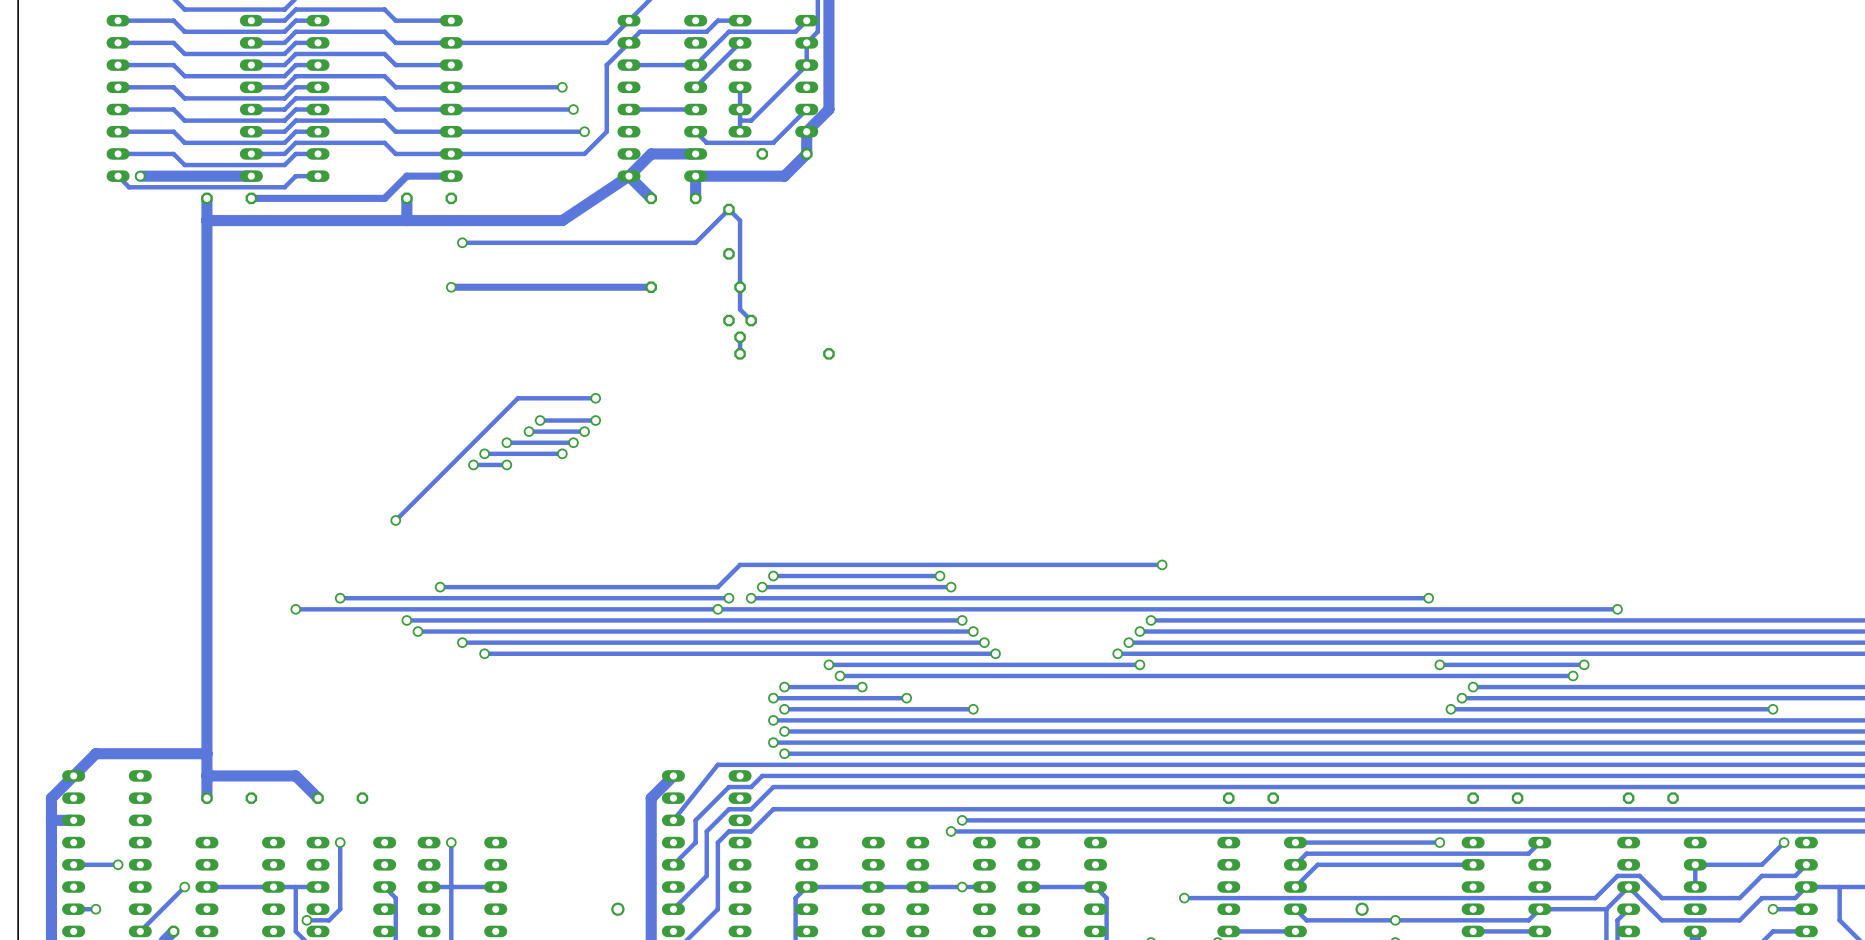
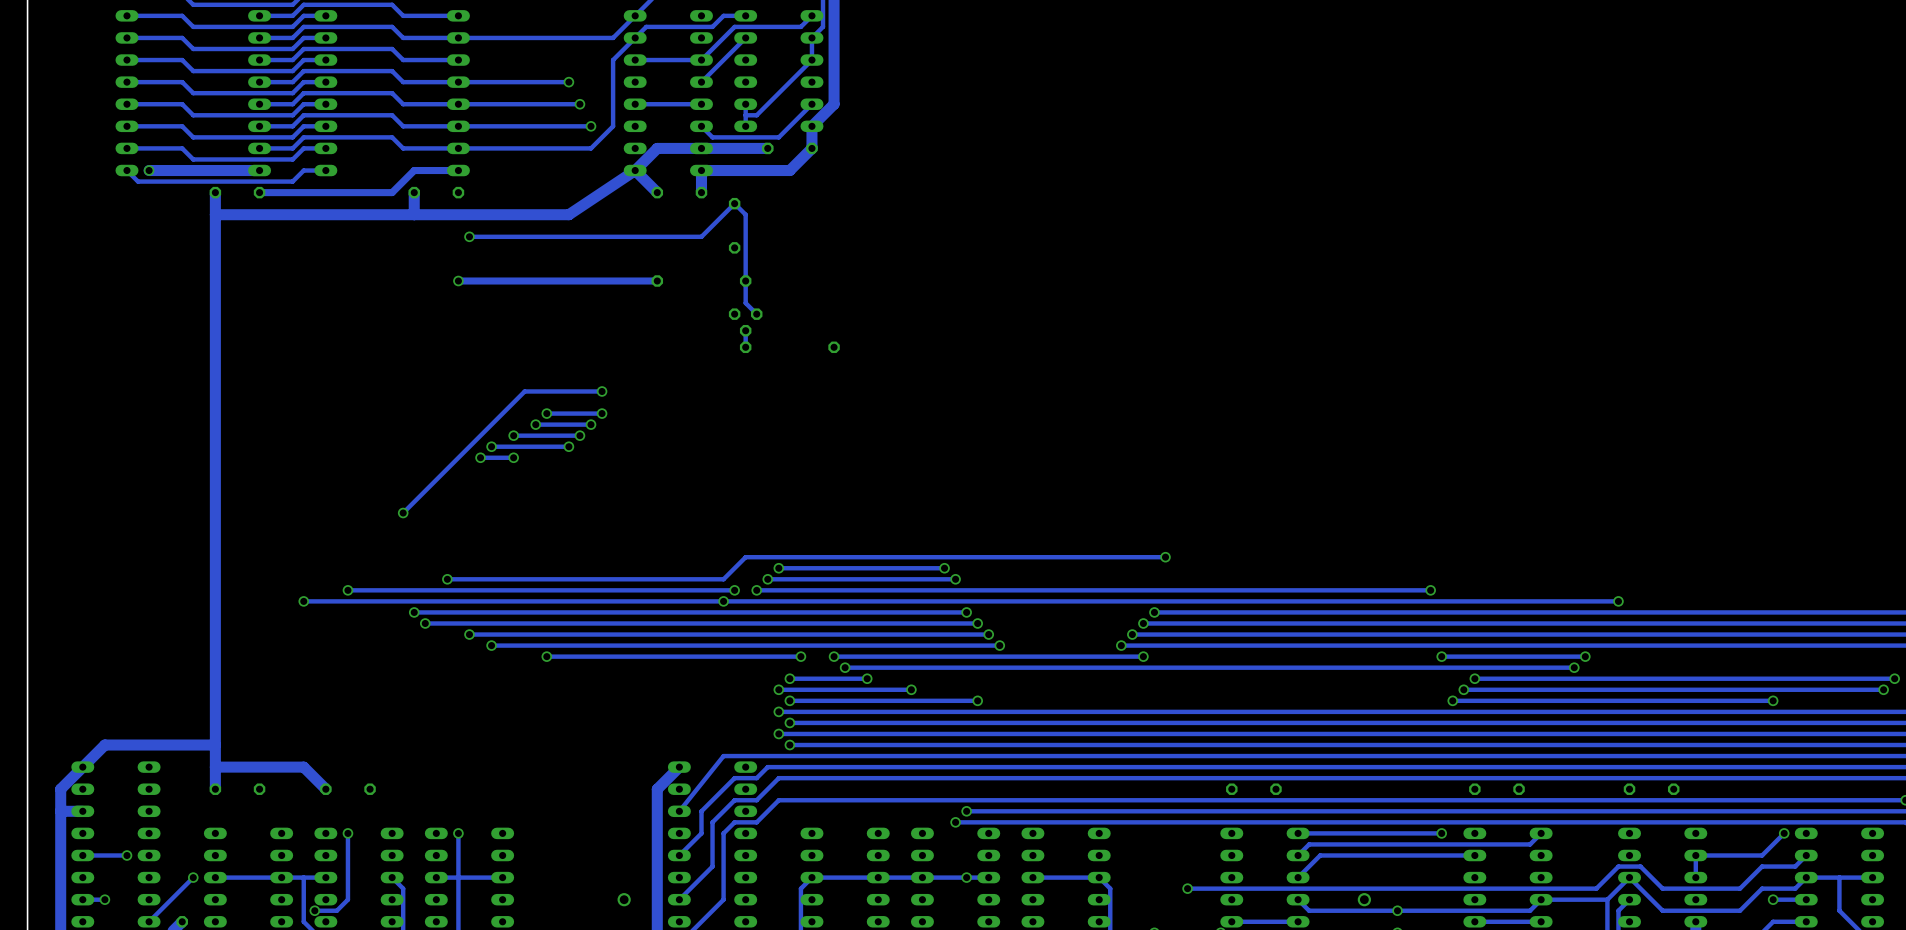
track: (740, 87) (740, 109) -> none
track: none -> (767, 148) (701, 148)
via: none -> (546, 656)
track: none -> (800, 656) (546, 656)
via: none -> (800, 656)

